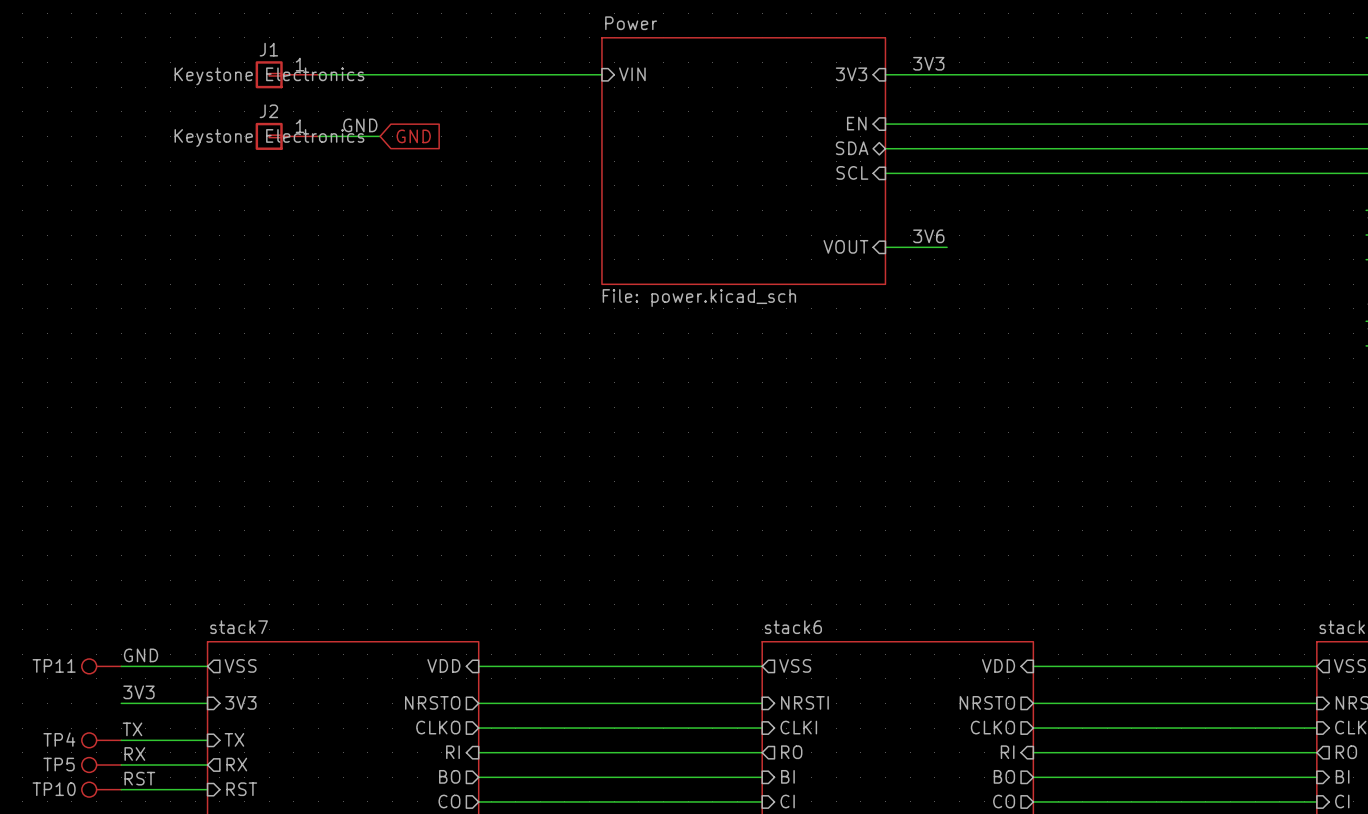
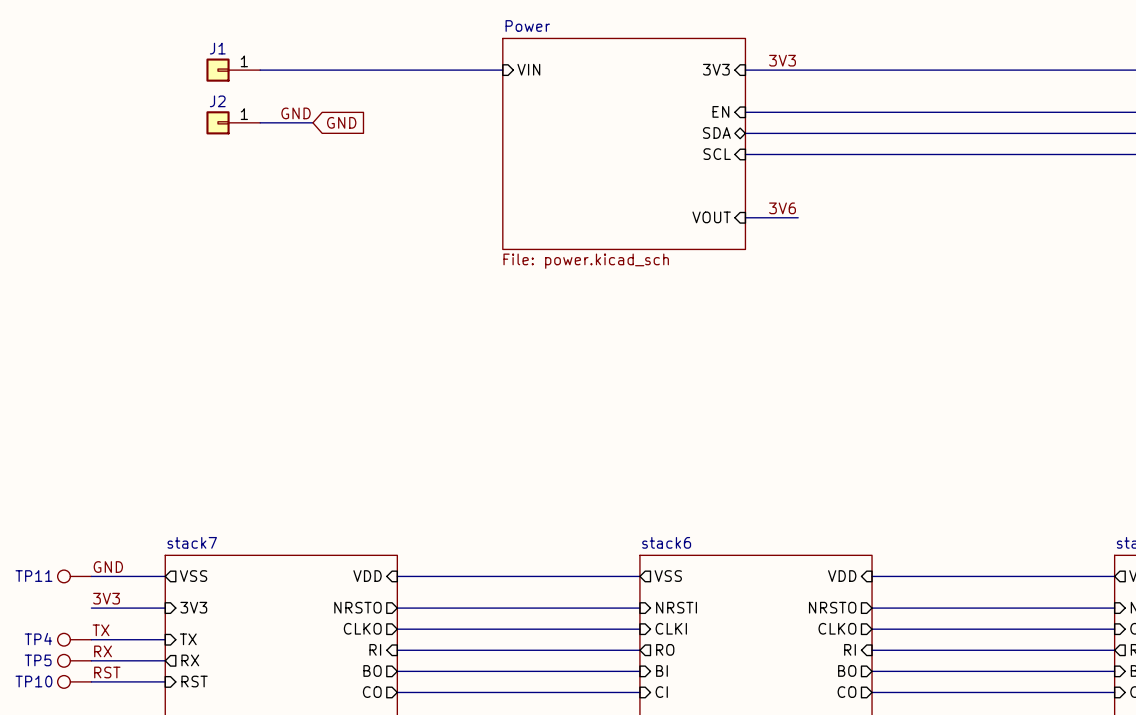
J1 text: Keystone Electronics (269, 76) -> none
J2 text: Keystone Electronics (269, 137) -> none

